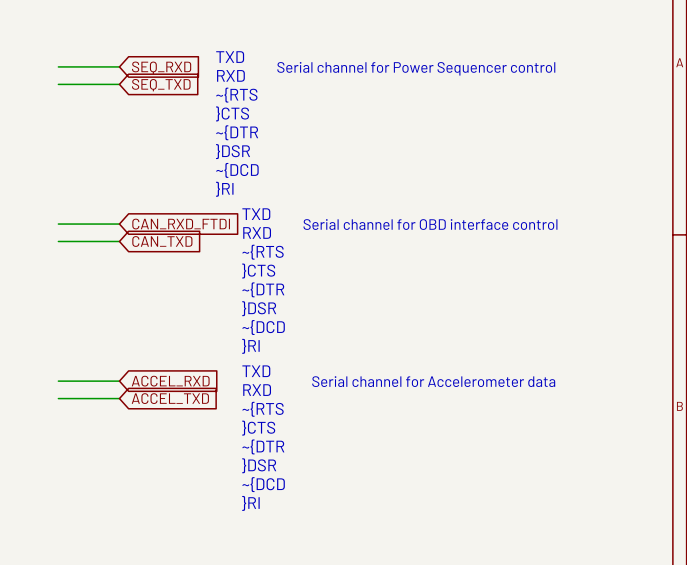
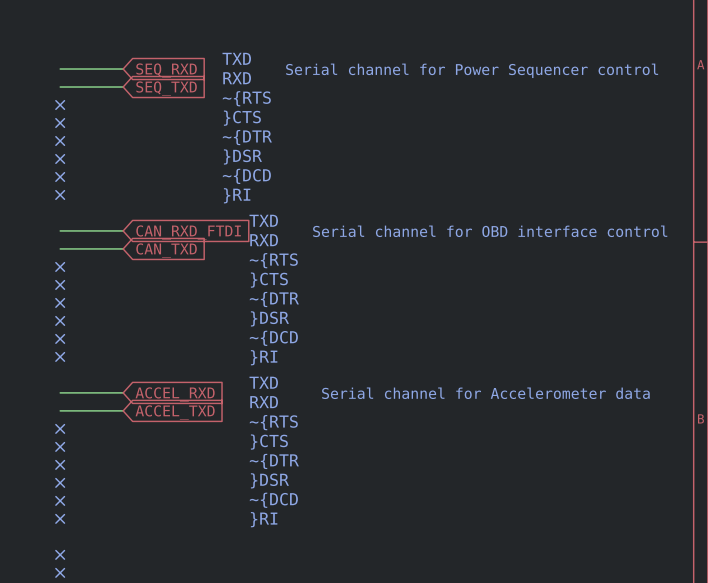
no-connect mark: none -> (60, 105)
no-connect mark: none -> (60, 122)
no-connect mark: none -> (60, 140)
no-connect mark: none -> (60, 158)
no-connect mark: none -> (60, 176)
no-connect mark: none -> (60, 194)
no-connect mark: none -> (60, 266)
no-connect mark: none -> (60, 284)
no-connect mark: none -> (60, 302)
no-connect mark: none -> (60, 320)
no-connect mark: none -> (60, 338)
no-connect mark: none -> (60, 356)
no-connect mark: none -> (60, 428)
no-connect mark: none -> (60, 446)
no-connect mark: none -> (60, 464)
no-connect mark: none -> (60, 482)
no-connect mark: none -> (60, 500)
no-connect mark: none -> (60, 518)
no-connect mark: none -> (60, 554)
no-connect mark: none -> (60, 572)

